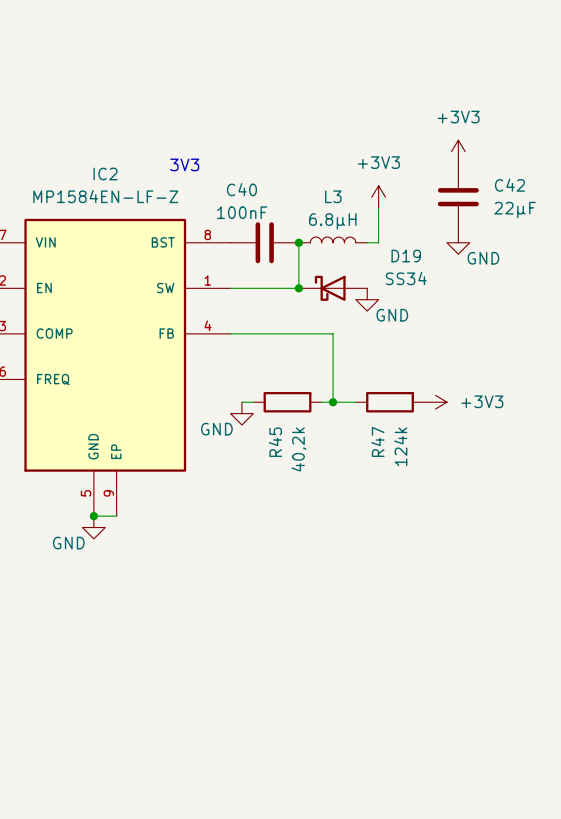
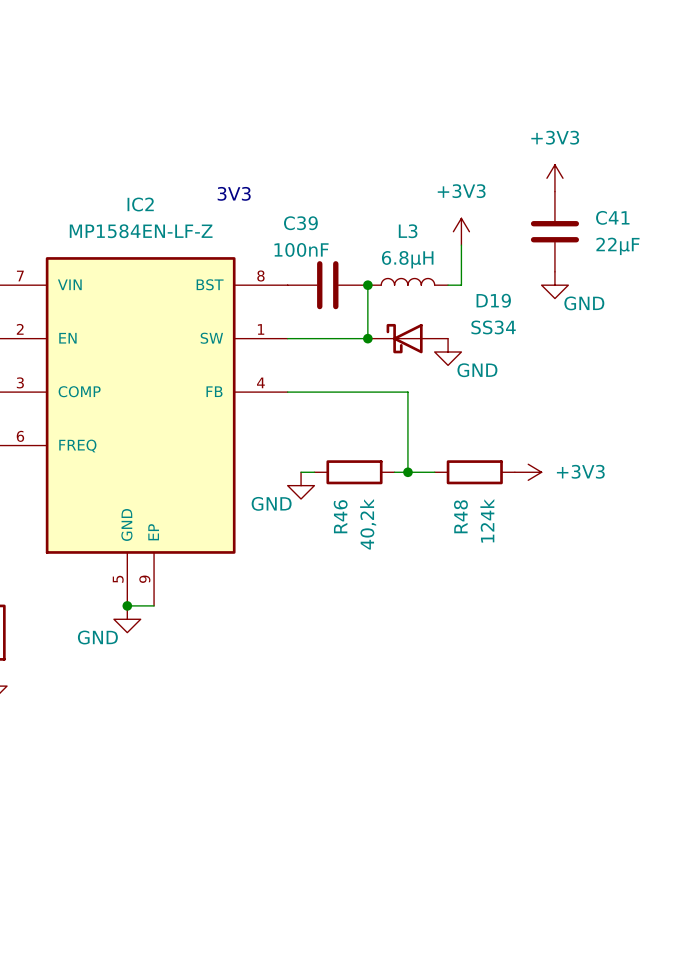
C42 name: C42 (509, 185) -> C41 (612, 217)
C40 name: C40 (241, 189) -> C39 (300, 223)
R47 name: R47 (377, 441) -> R48 (460, 516)
R45 name: R45 (275, 442) -> R46 (340, 516)

